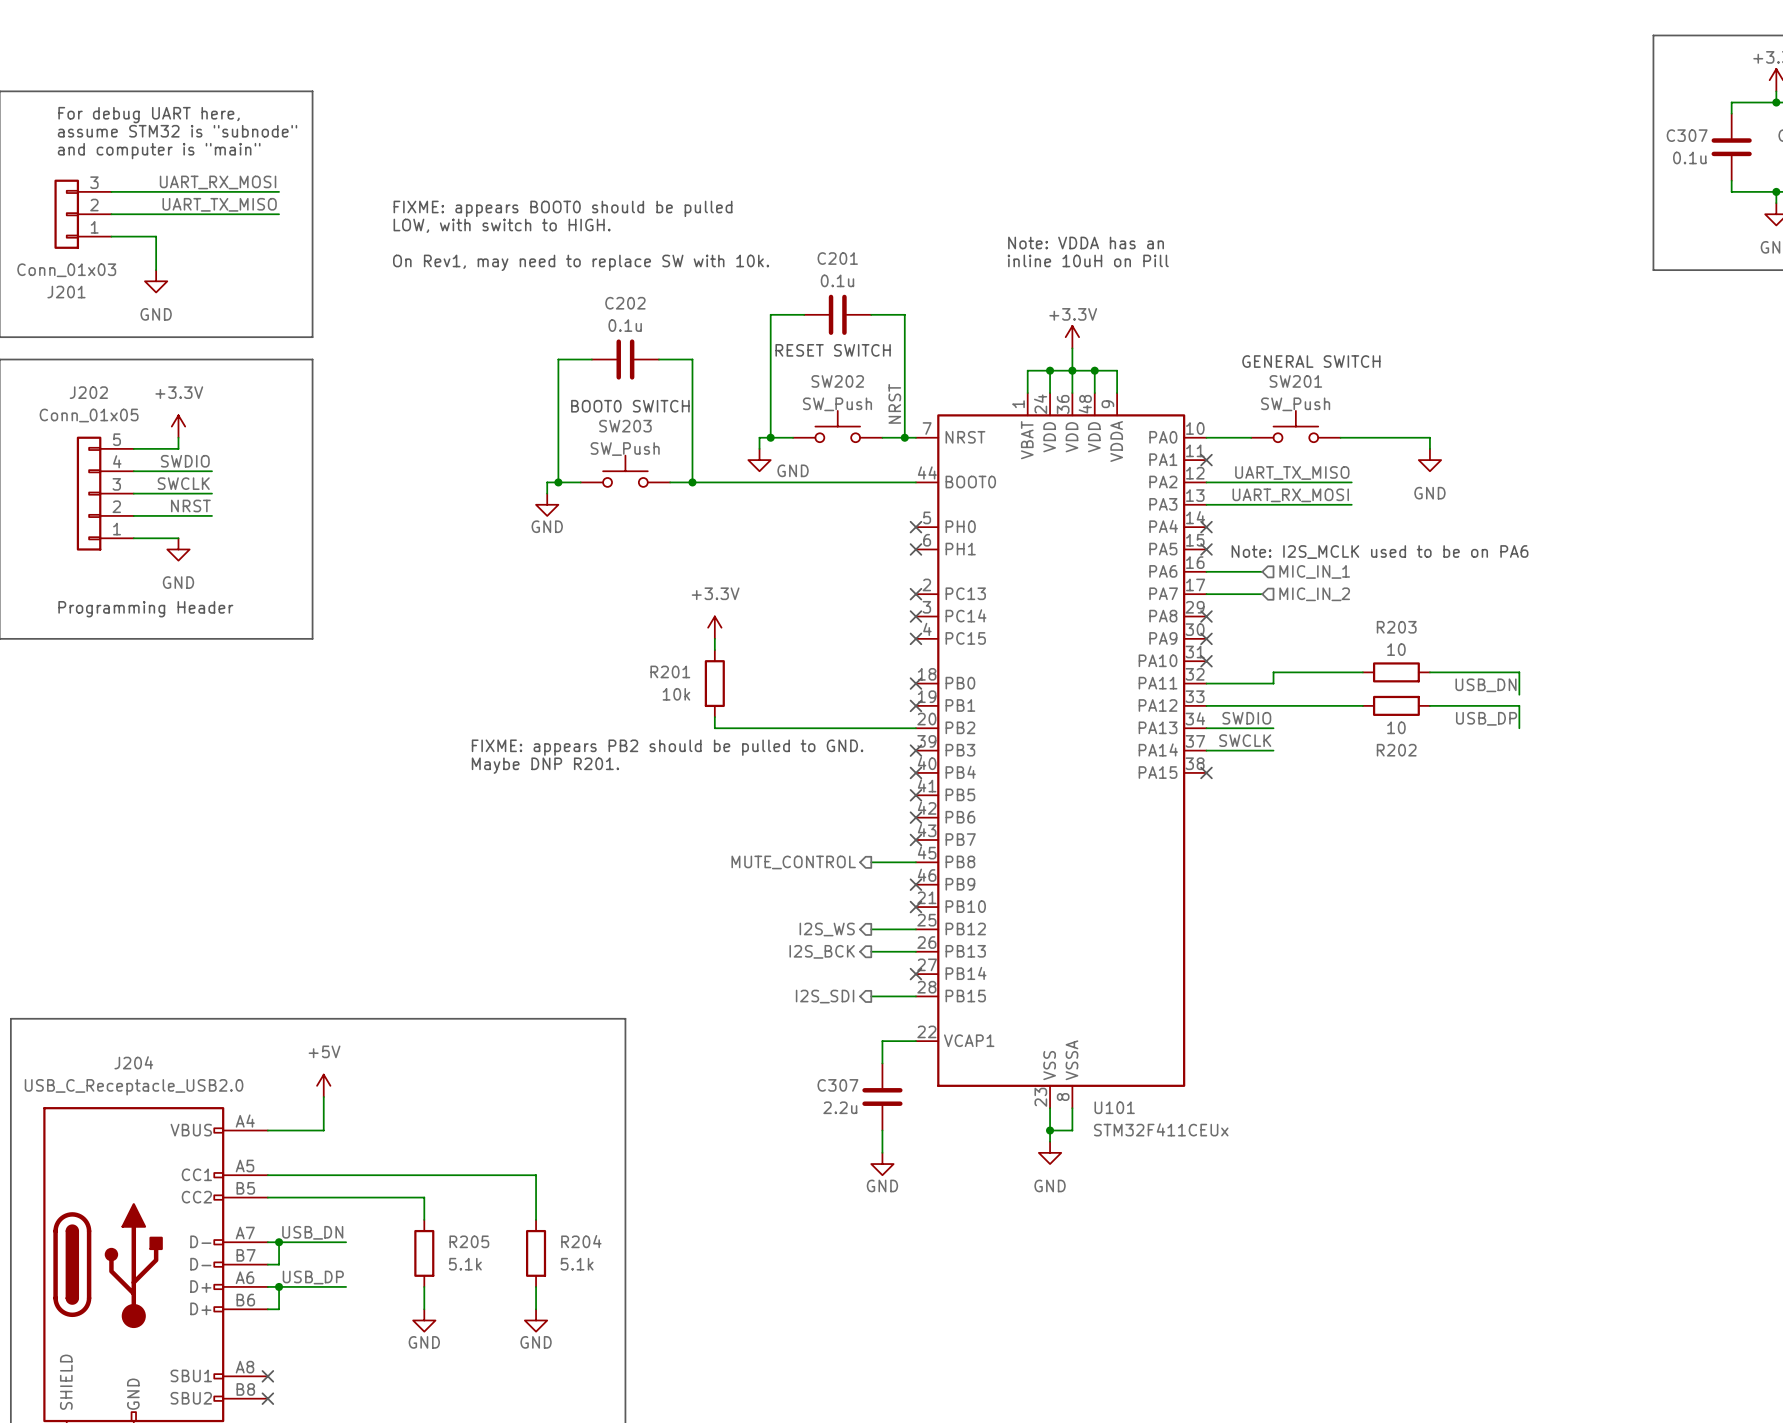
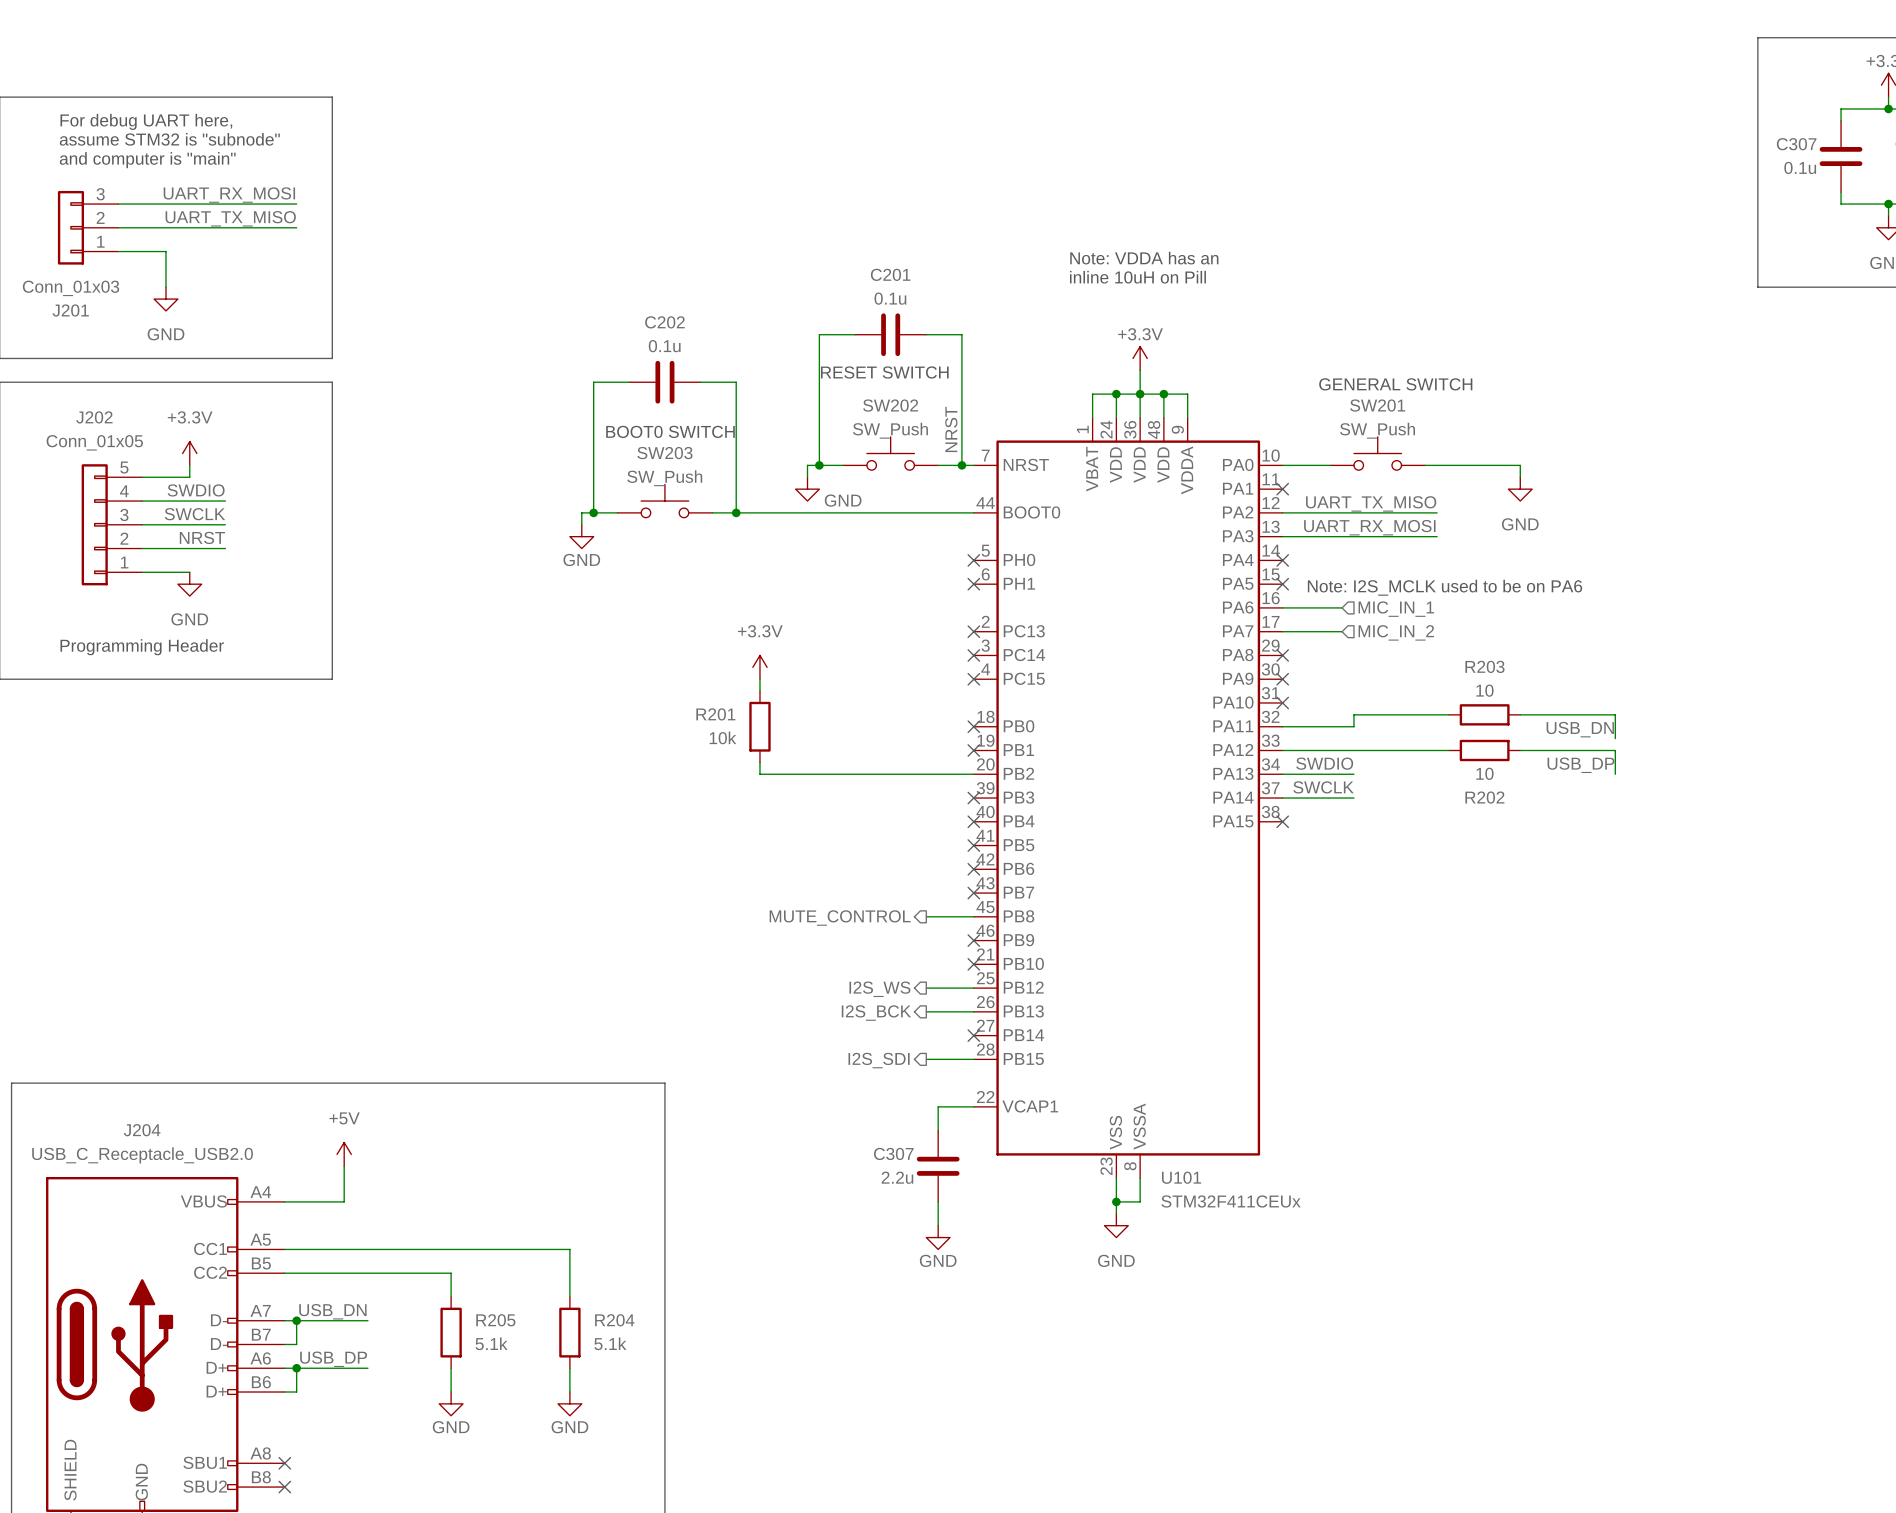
text: FIXME: appears BOOT0 should be pulled (563, 208) -> none
text: LOW, with switch to HIGH. (502, 225) -> none
text: On Rev1, may need to replace SW with 10k. (581, 262) -> none
text: FIXME: appears PB2 should be pulled to GND. (667, 747) -> none
text: Maybe DNP R201. (545, 765) -> none

